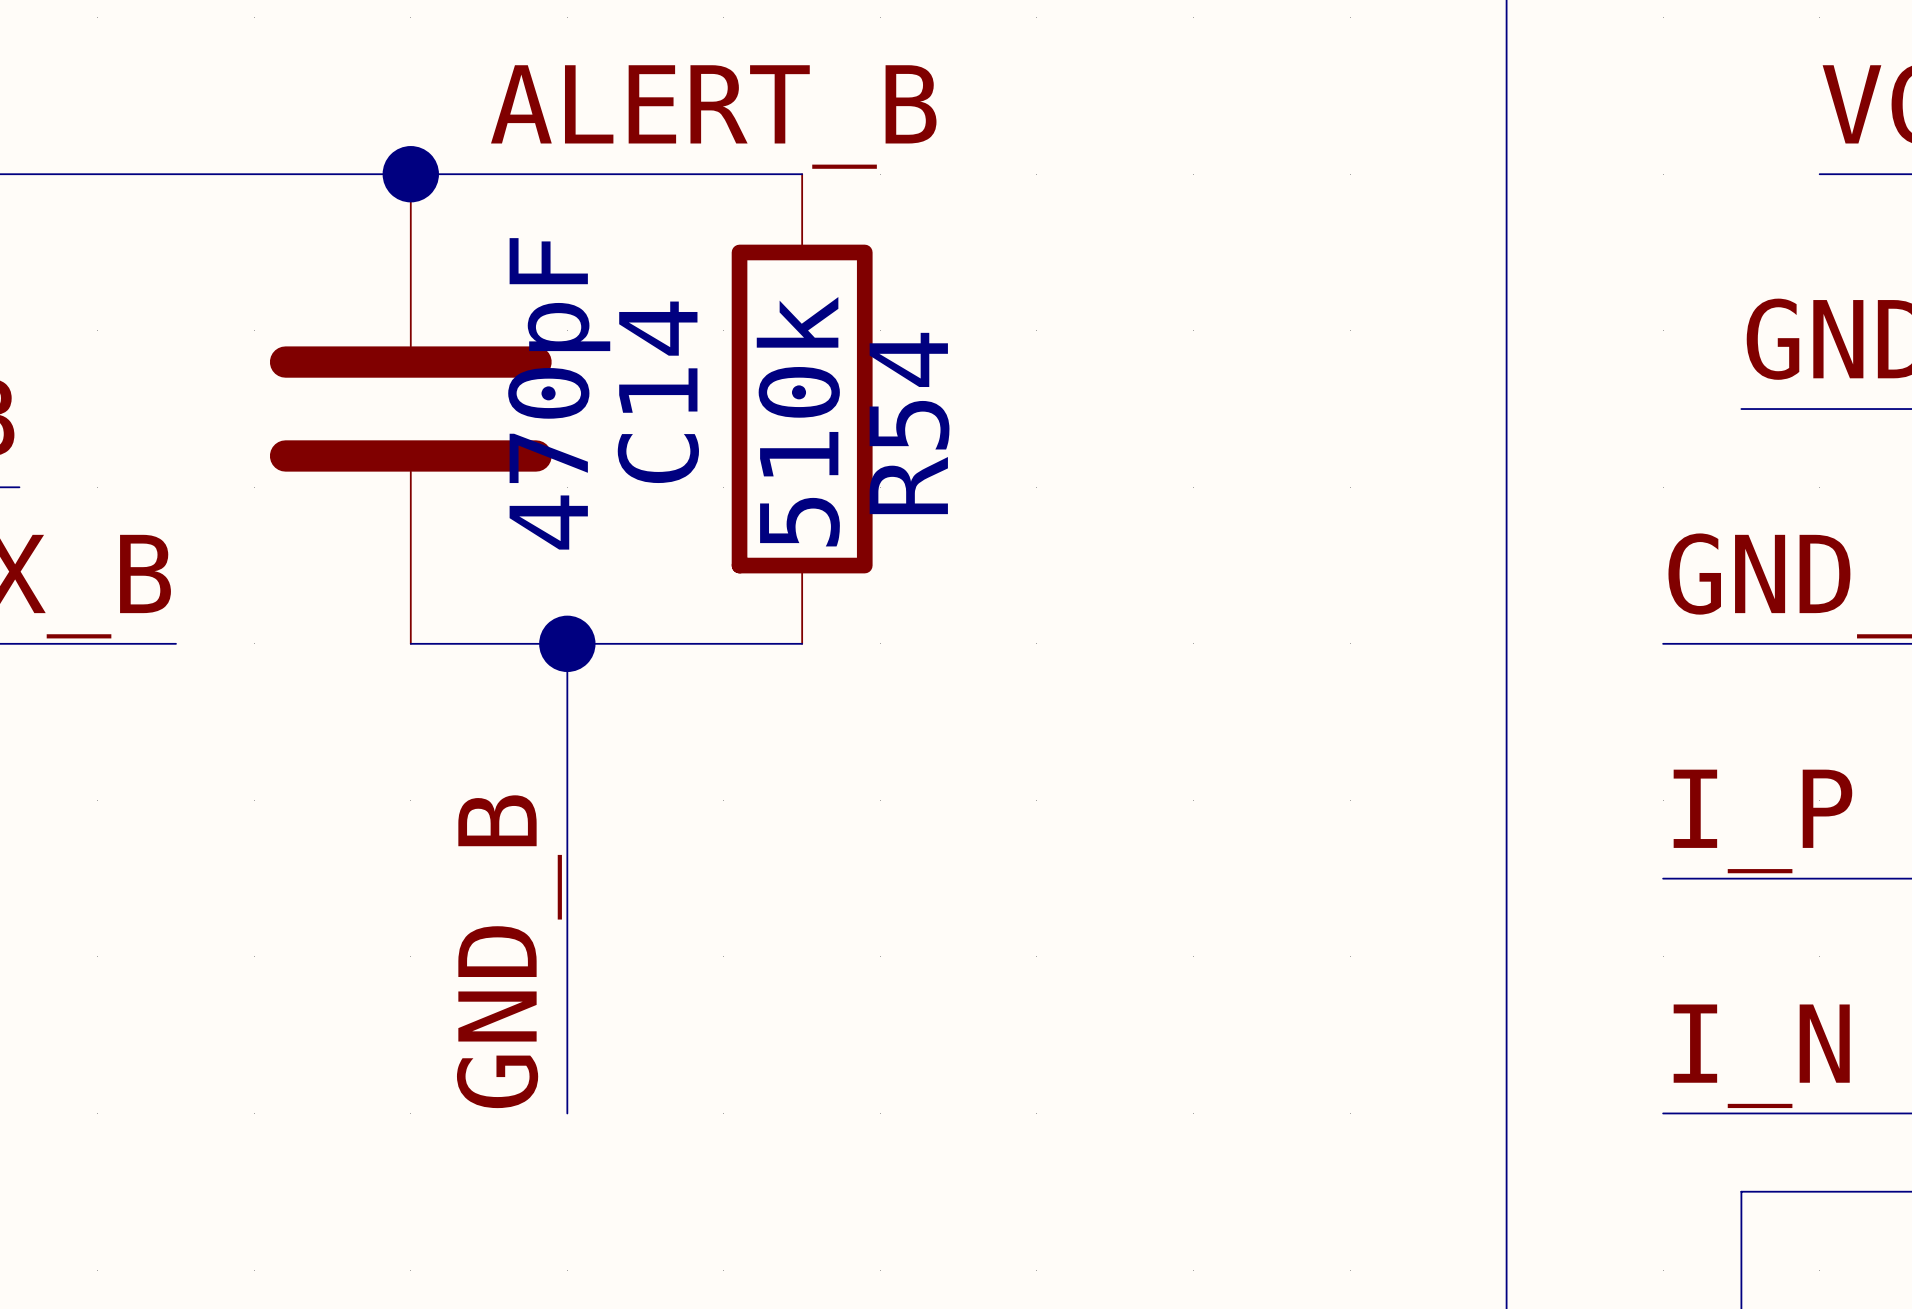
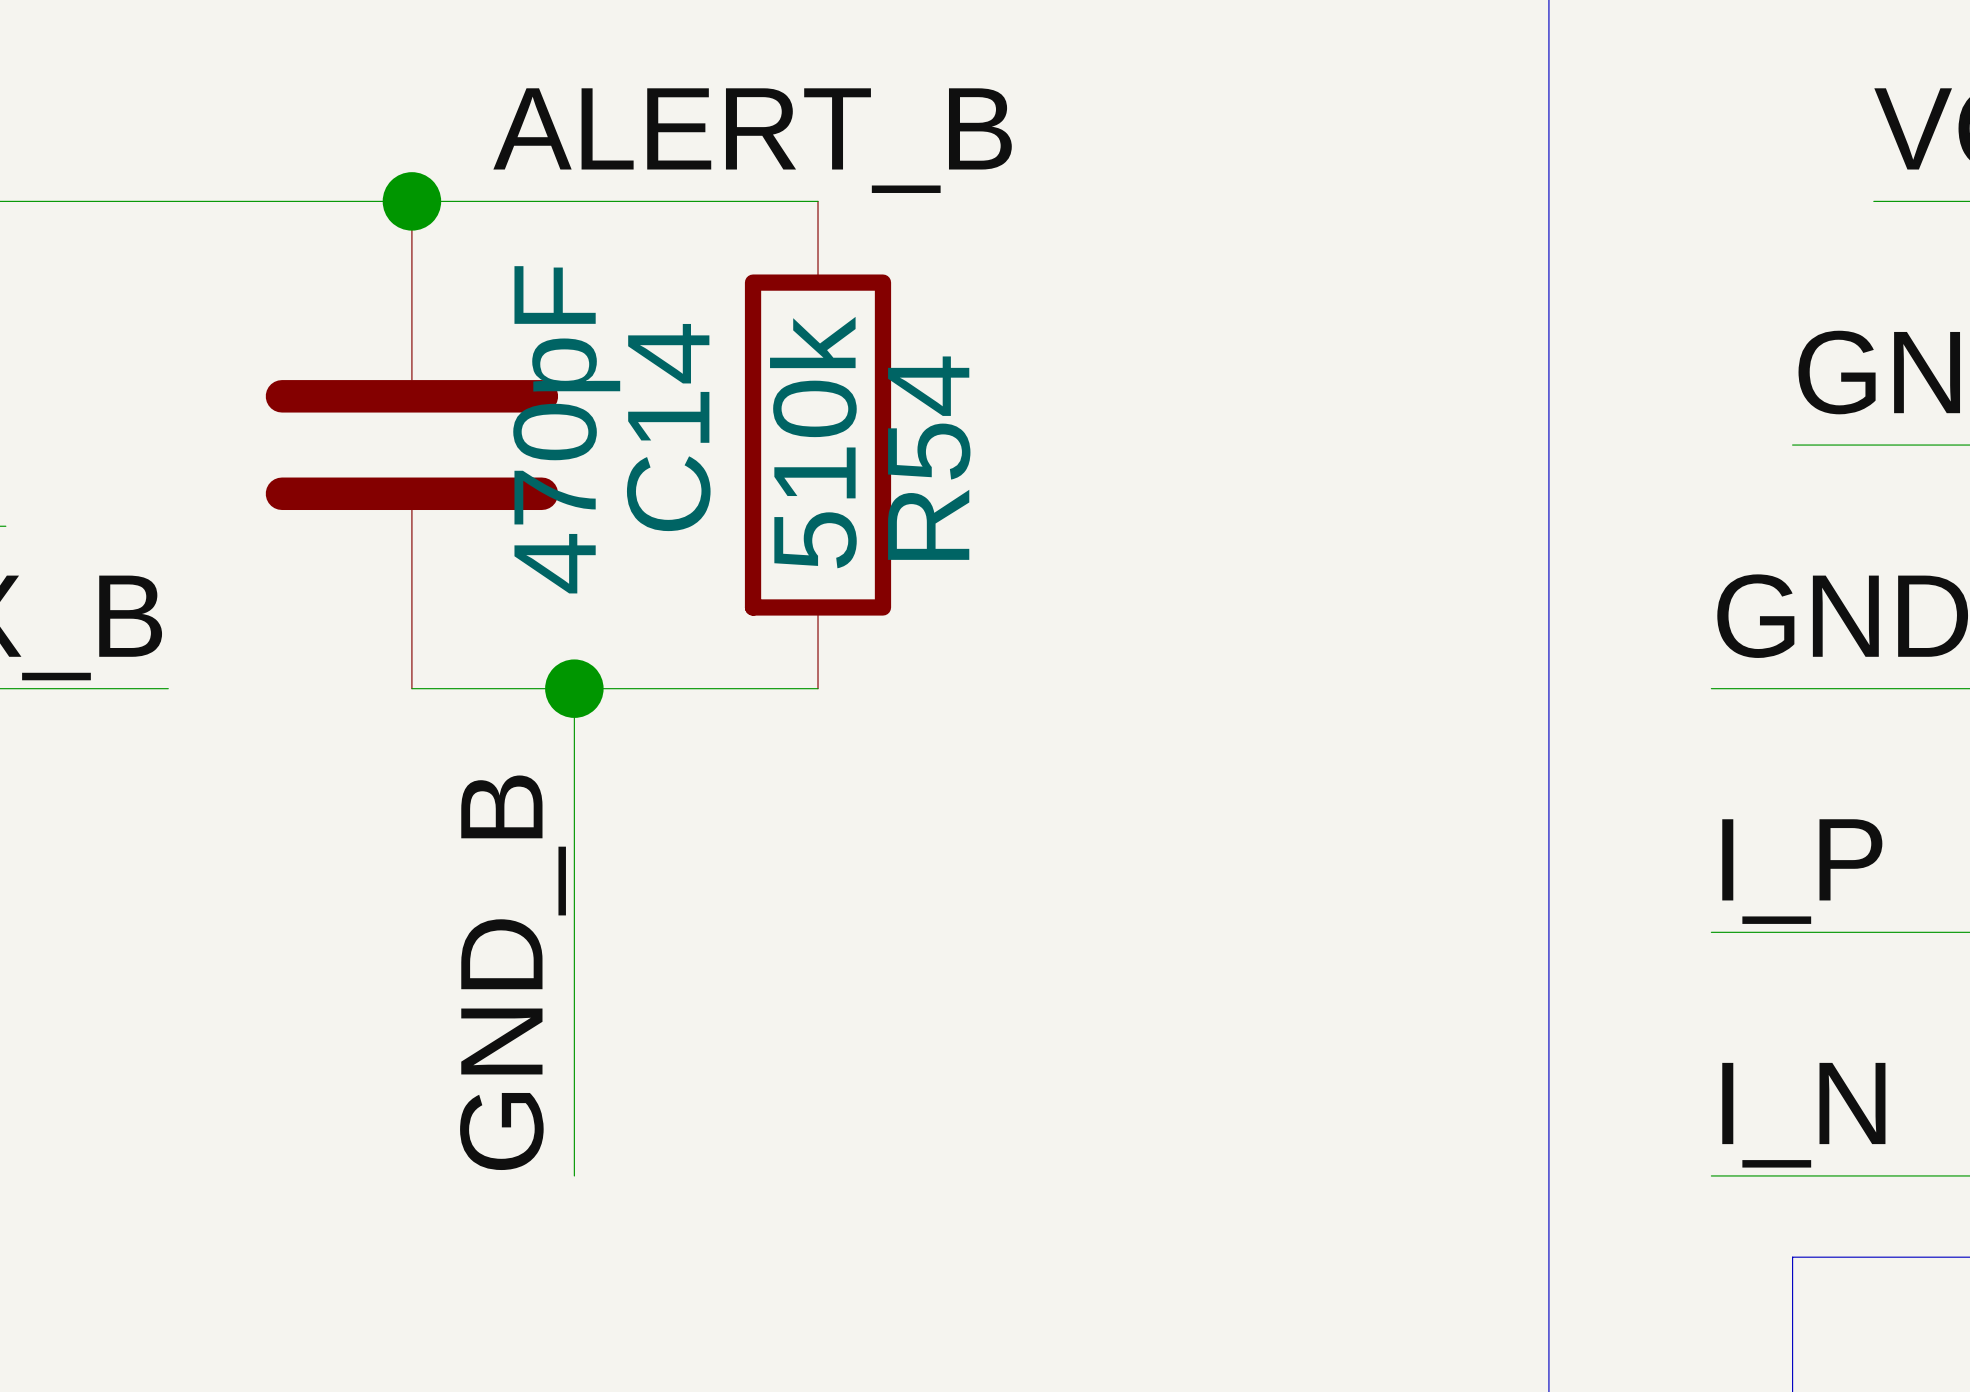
R54 value position: 510k (798, 421) -> 510k (813, 442)

